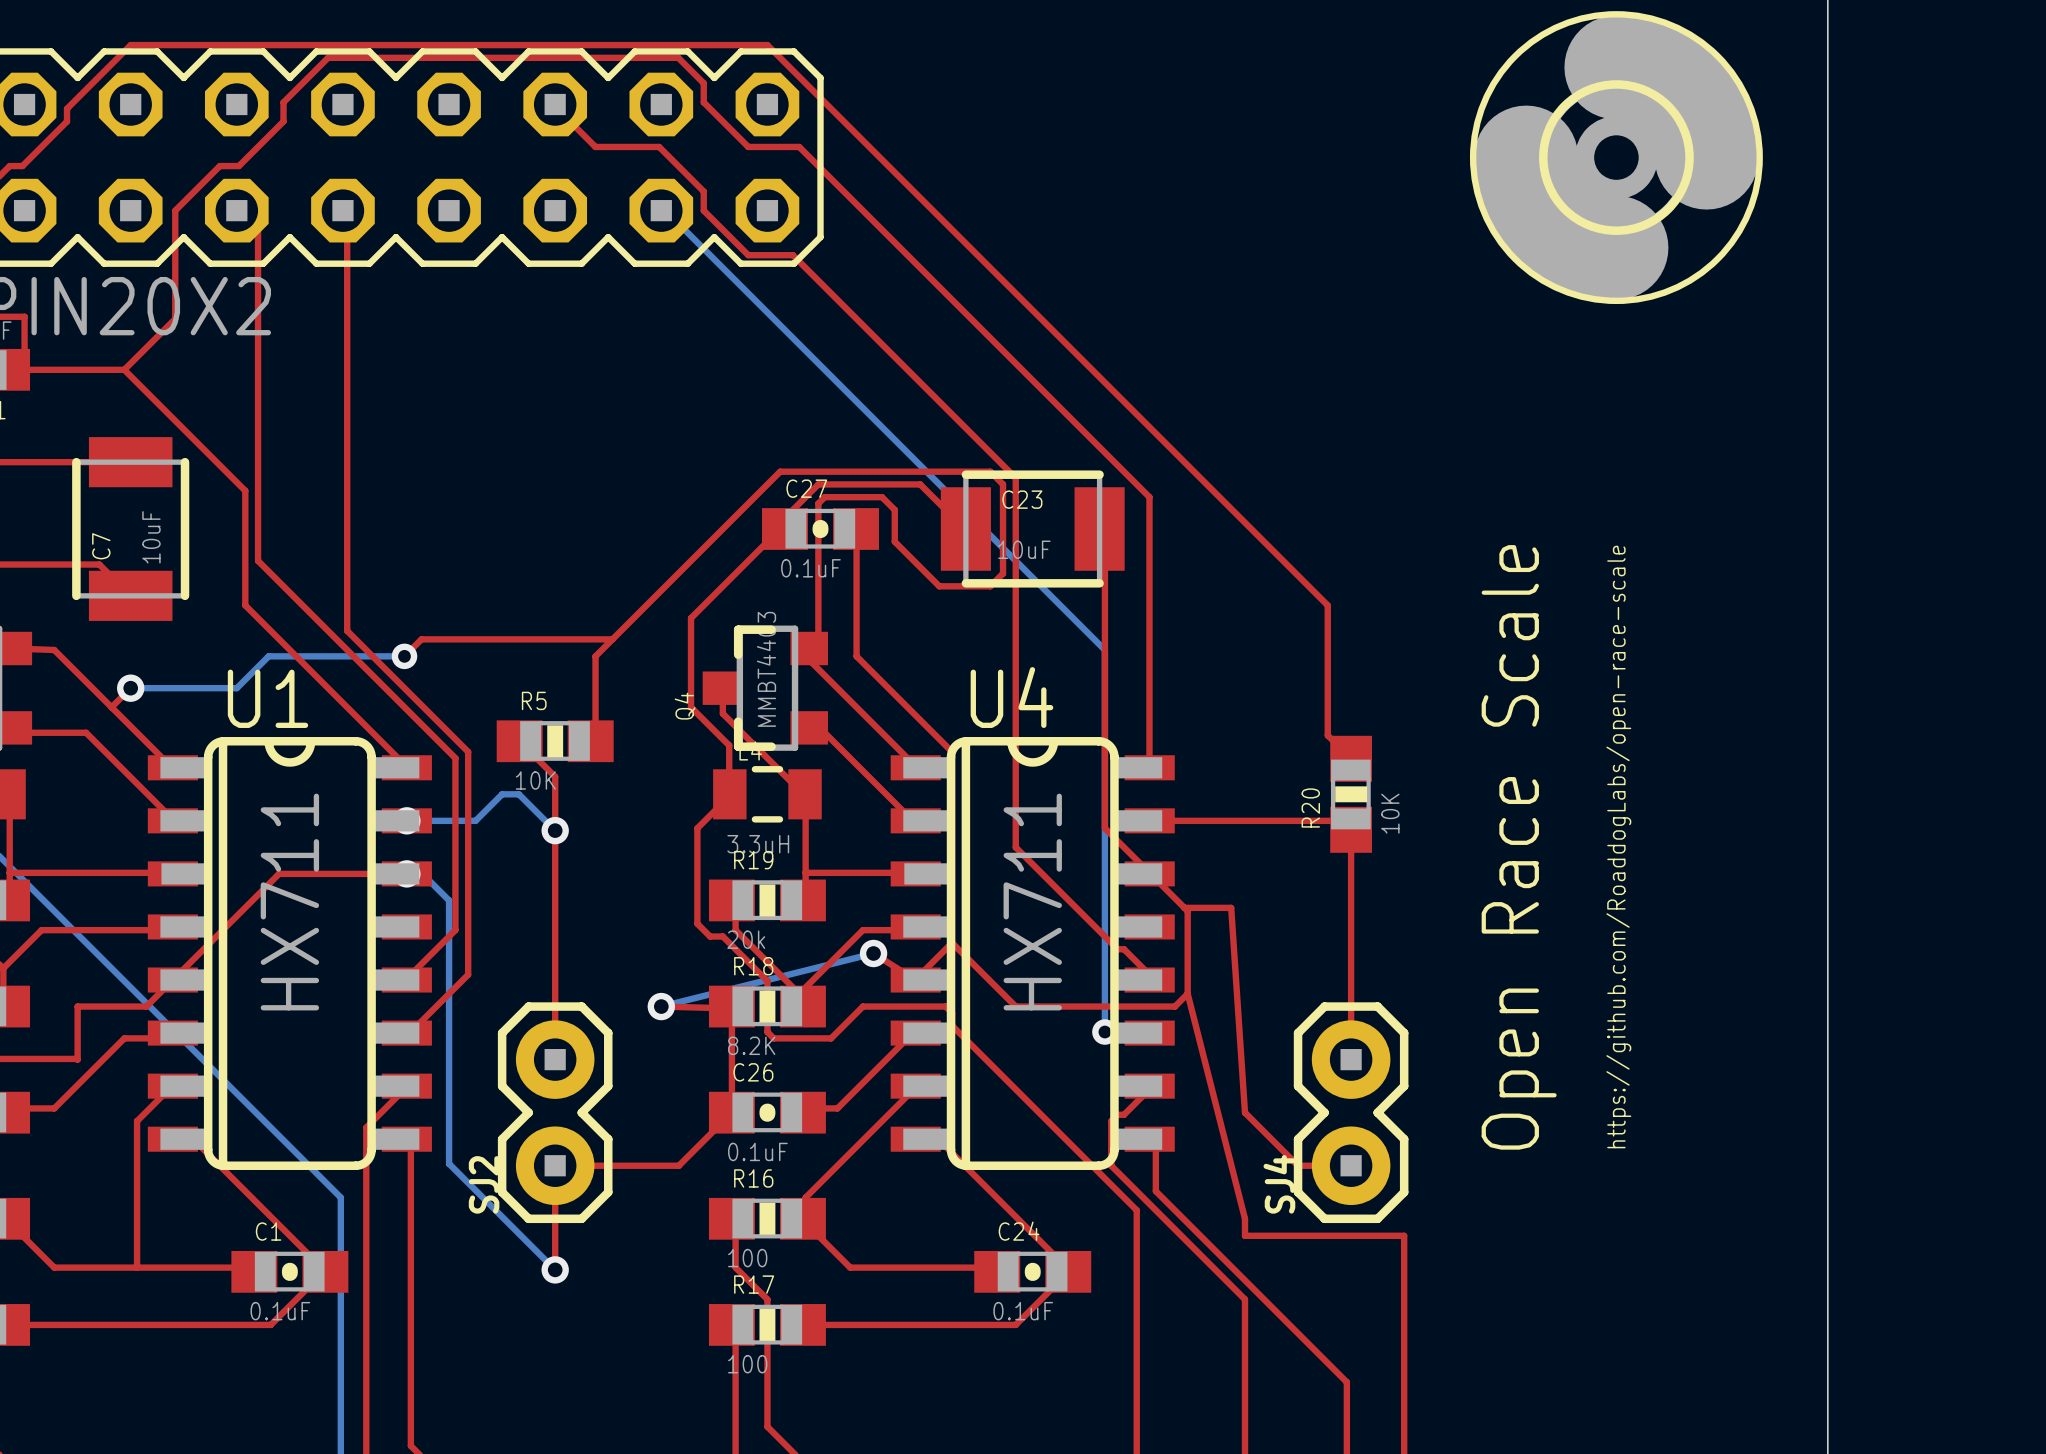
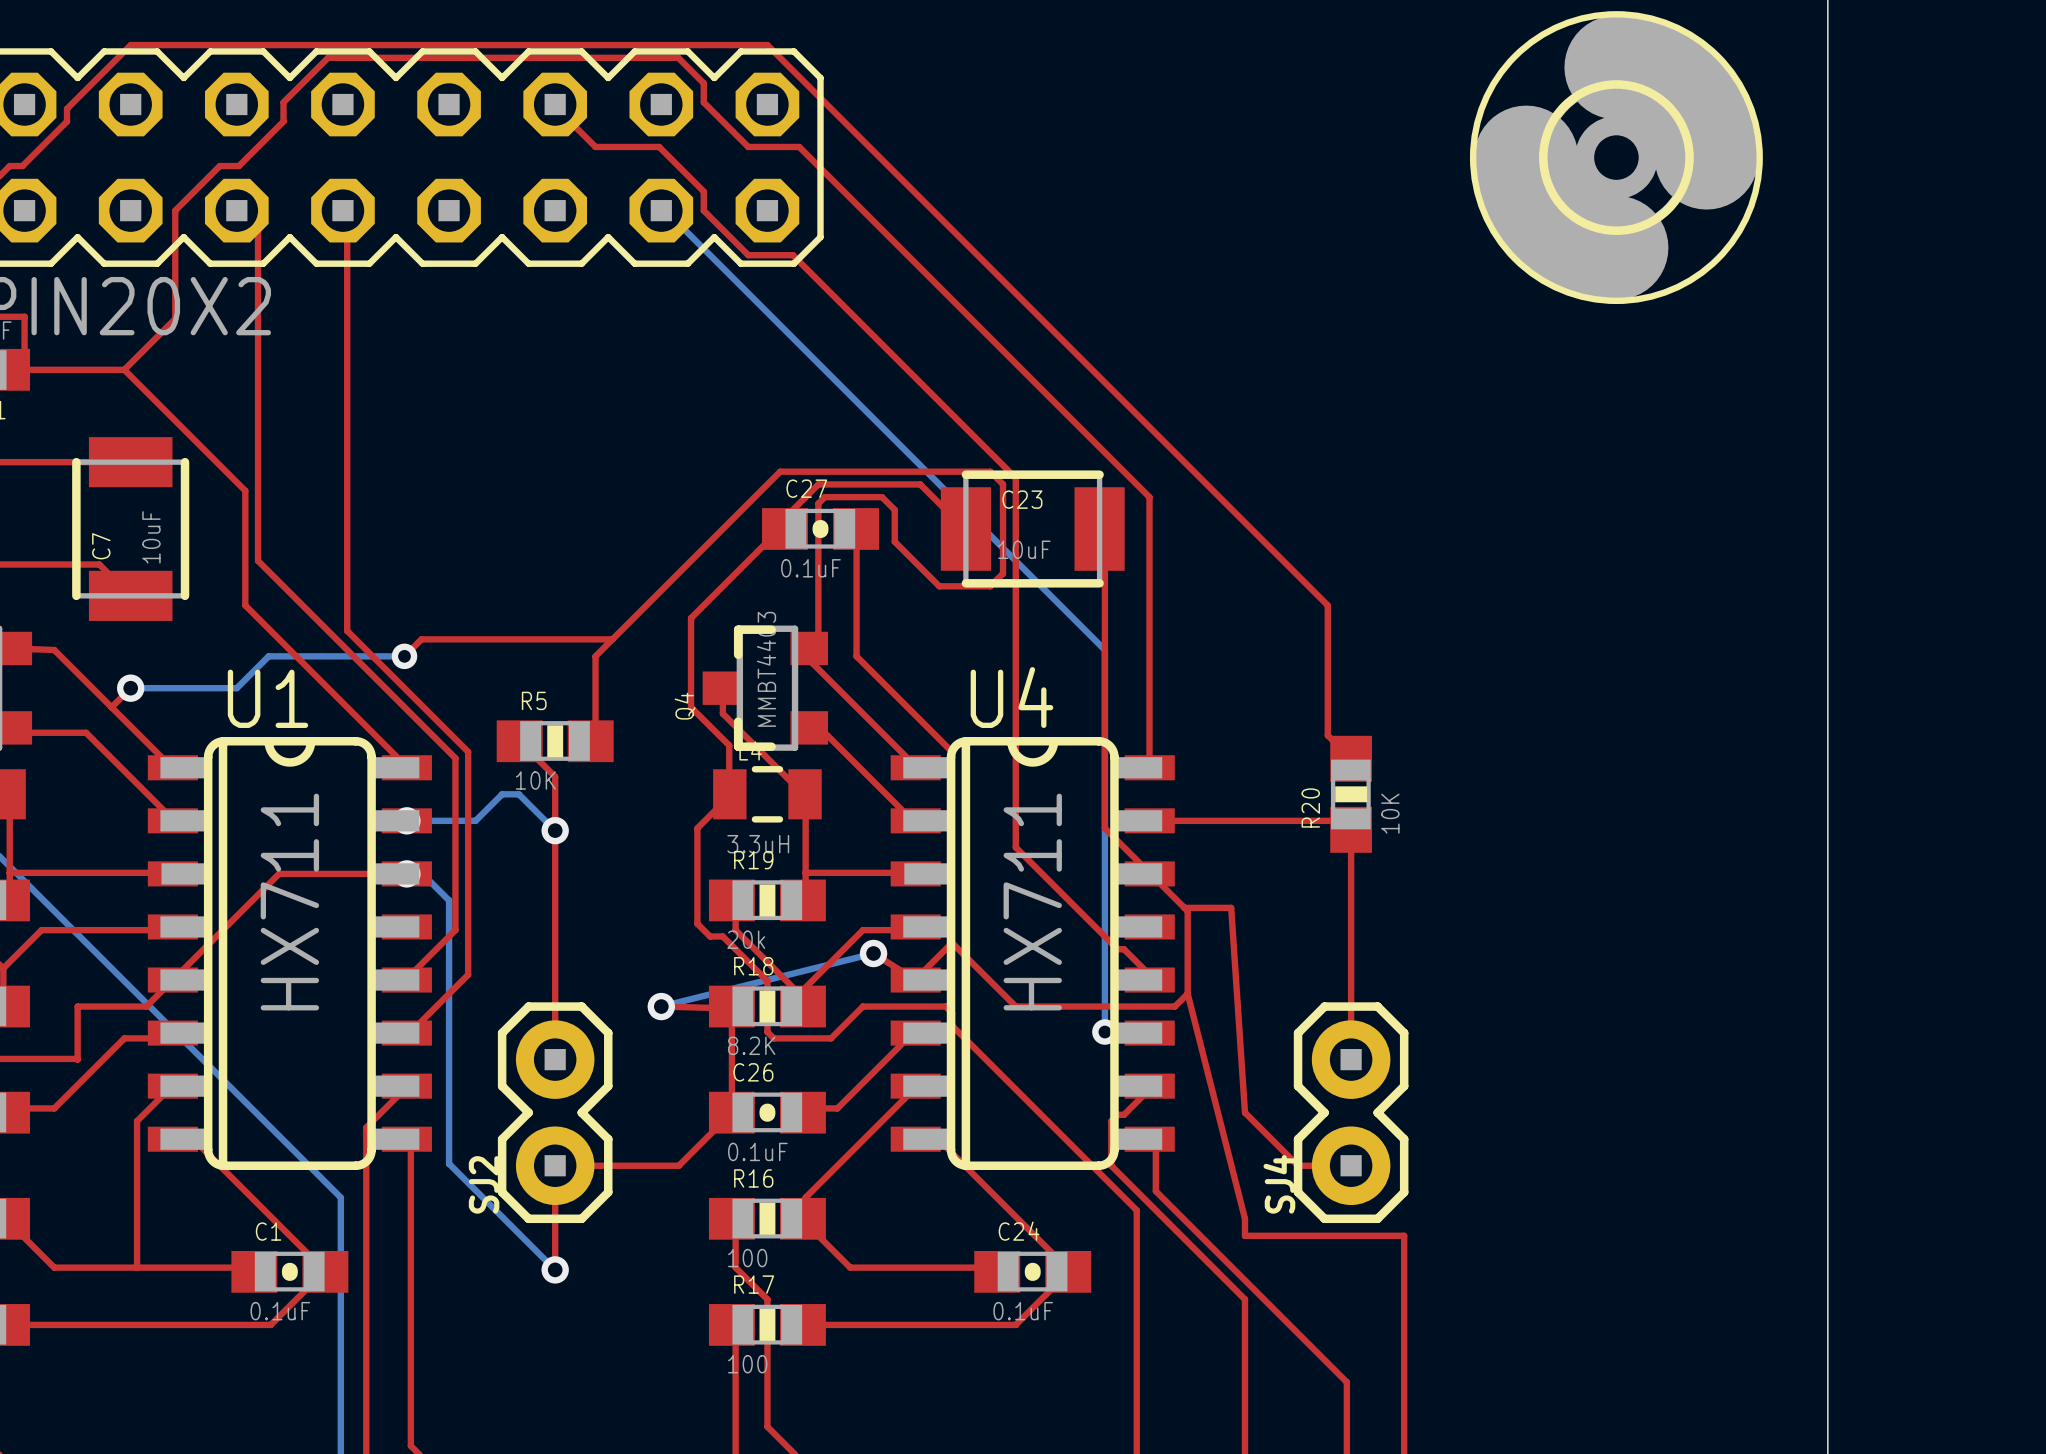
text: Open Race Scale (1519, 847) -> none
text: https://github.com/RoaddogLabs/open-race-scale (1618, 847) -> none

